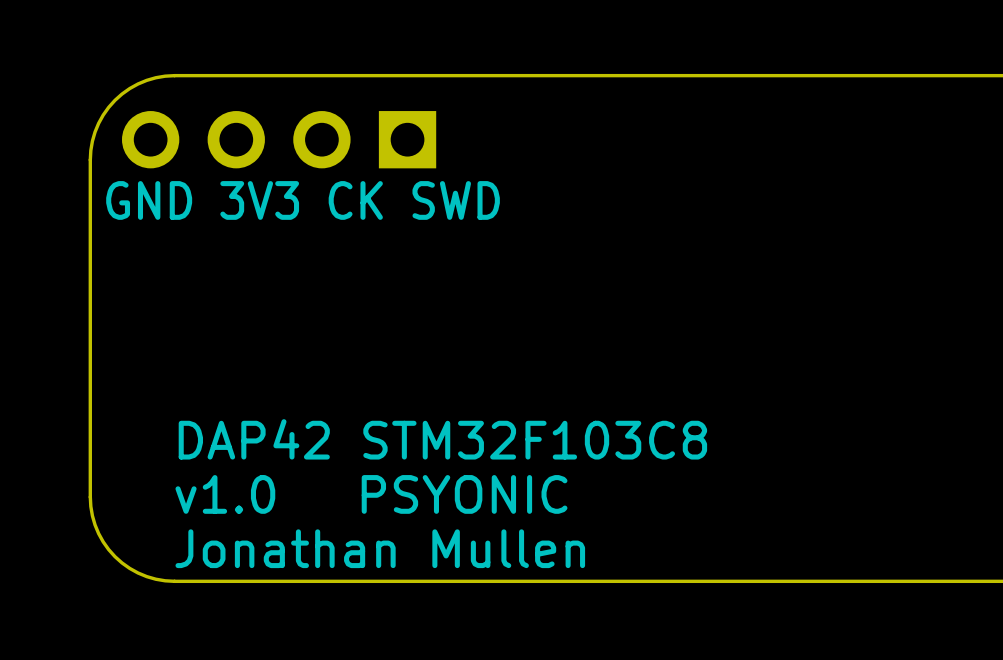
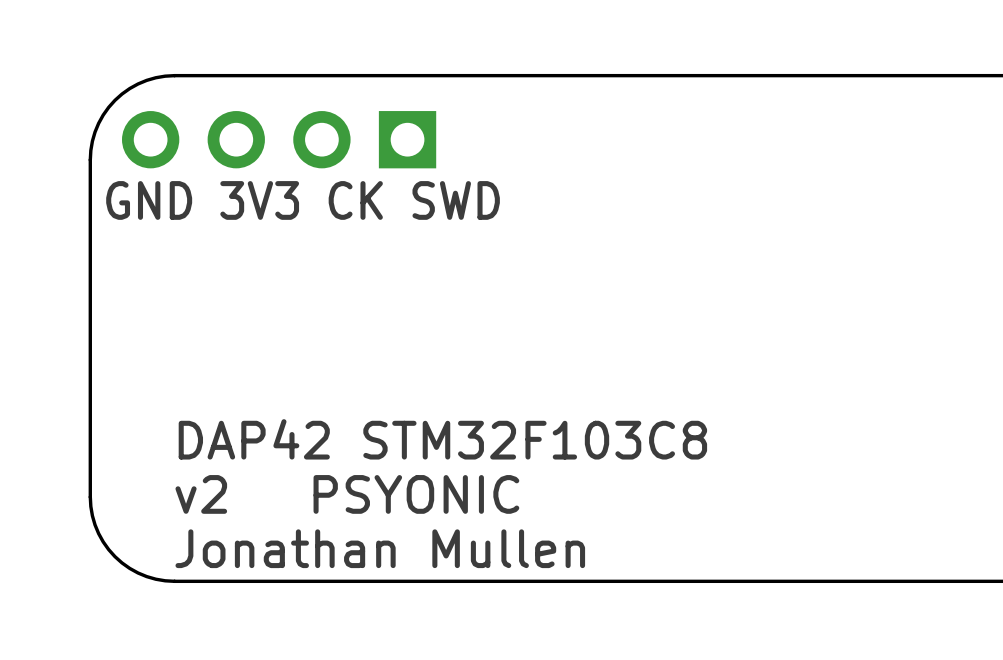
text: v1.0 PSYONIC (371, 494) -> v2 PSYONIC (347, 494)

